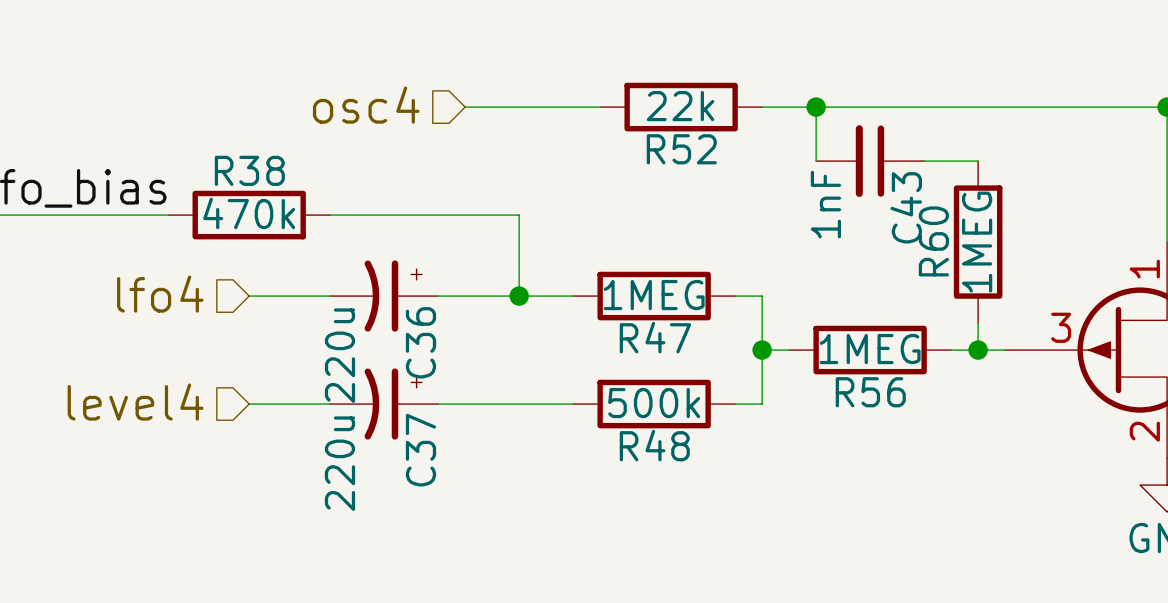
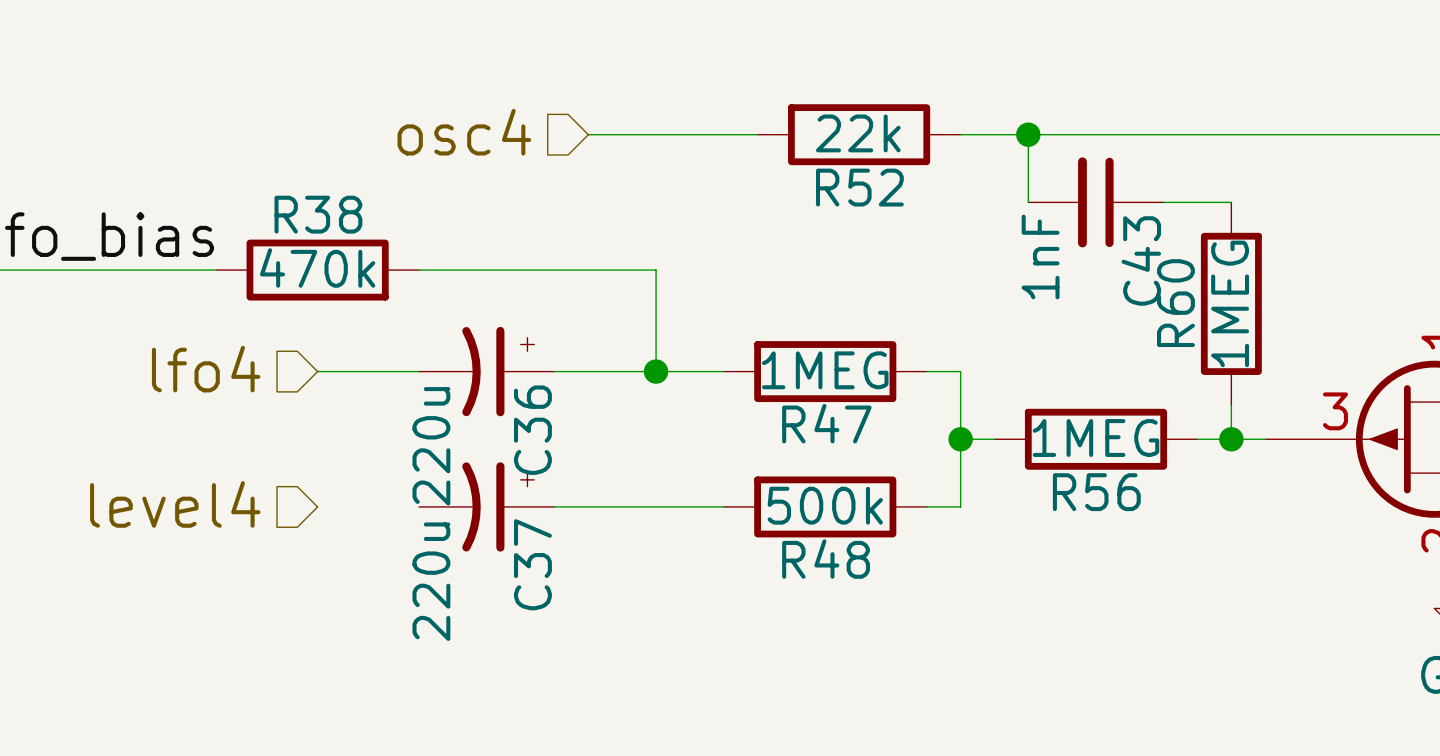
wire: (249, 404) (330, 404) -> none

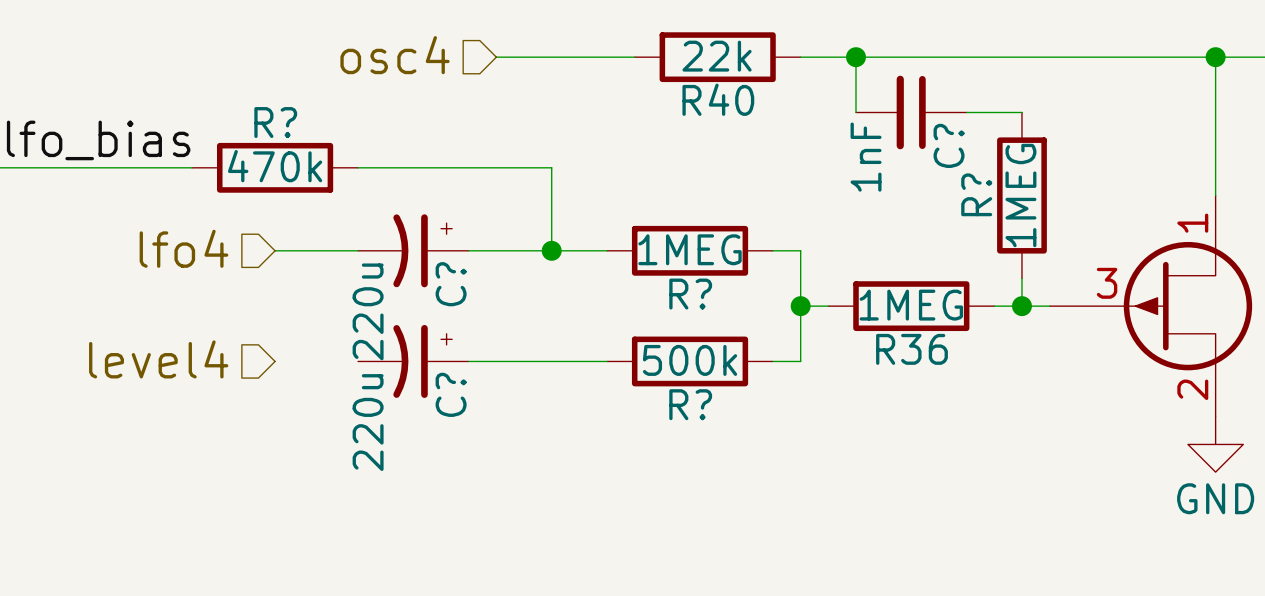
R52 name: R52 (859, 187) -> R40 (718, 99)
R38 name: R38 (318, 214) -> R? (275, 122)
C43 name: C43 (1141, 260) -> C? (949, 145)
R60 name: R60 (1175, 303) -> R? (976, 194)
R47 name: R47 (826, 423) -> R? (690, 294)
C36 name: C36 (532, 430) -> C? (451, 284)
R56 name: R56 (1096, 492) -> R36 (911, 349)
R48 name: R48 (826, 559) -> R? (690, 404)
C37 name: C37 (532, 564) -> C? (451, 394)

